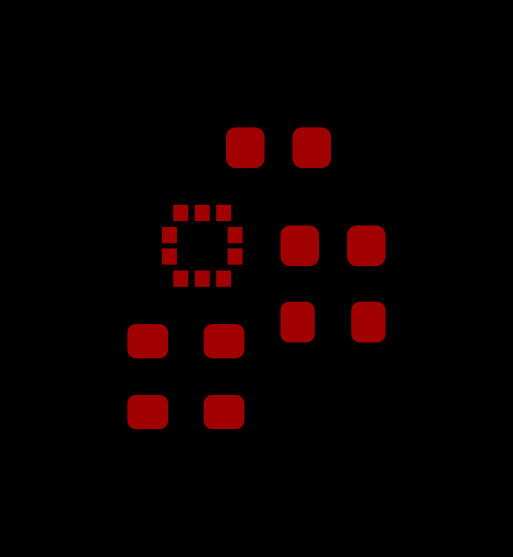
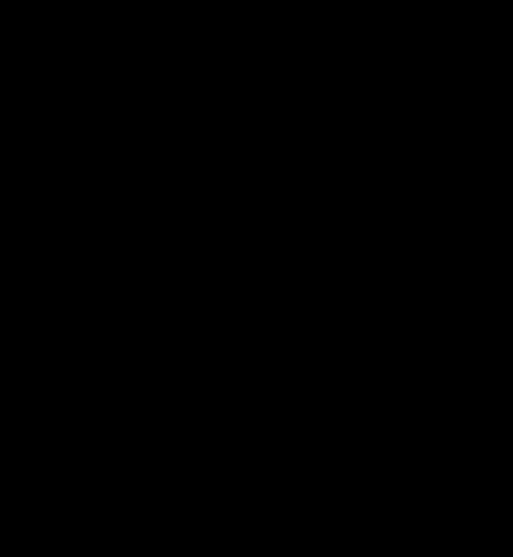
part: (278, 147) -> none
part: (202, 245) -> none
part: (333, 245) -> none
part: (333, 322) -> none
part: (147, 376) -> none
part: (224, 376) -> none

